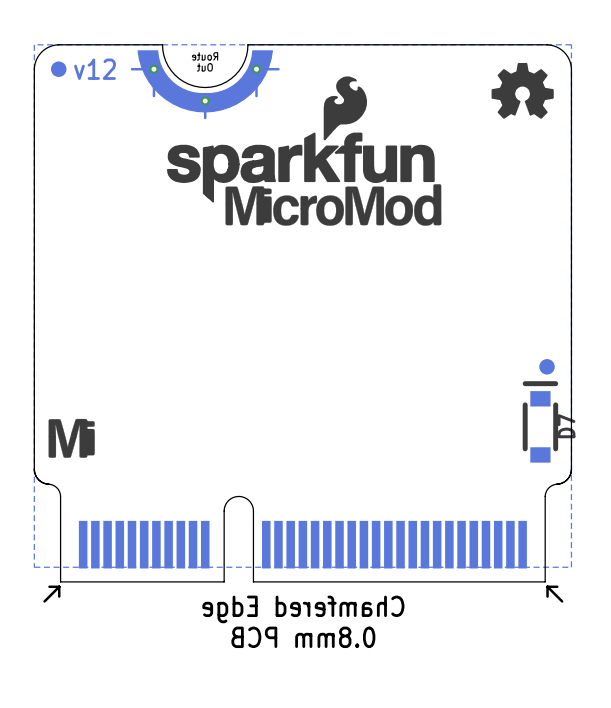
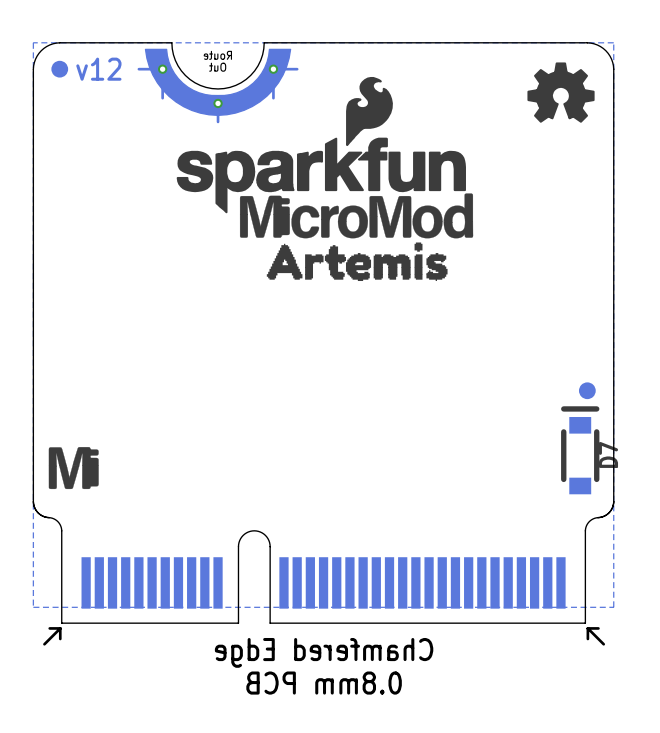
drawing: none -> [266, 242, 448, 282]

